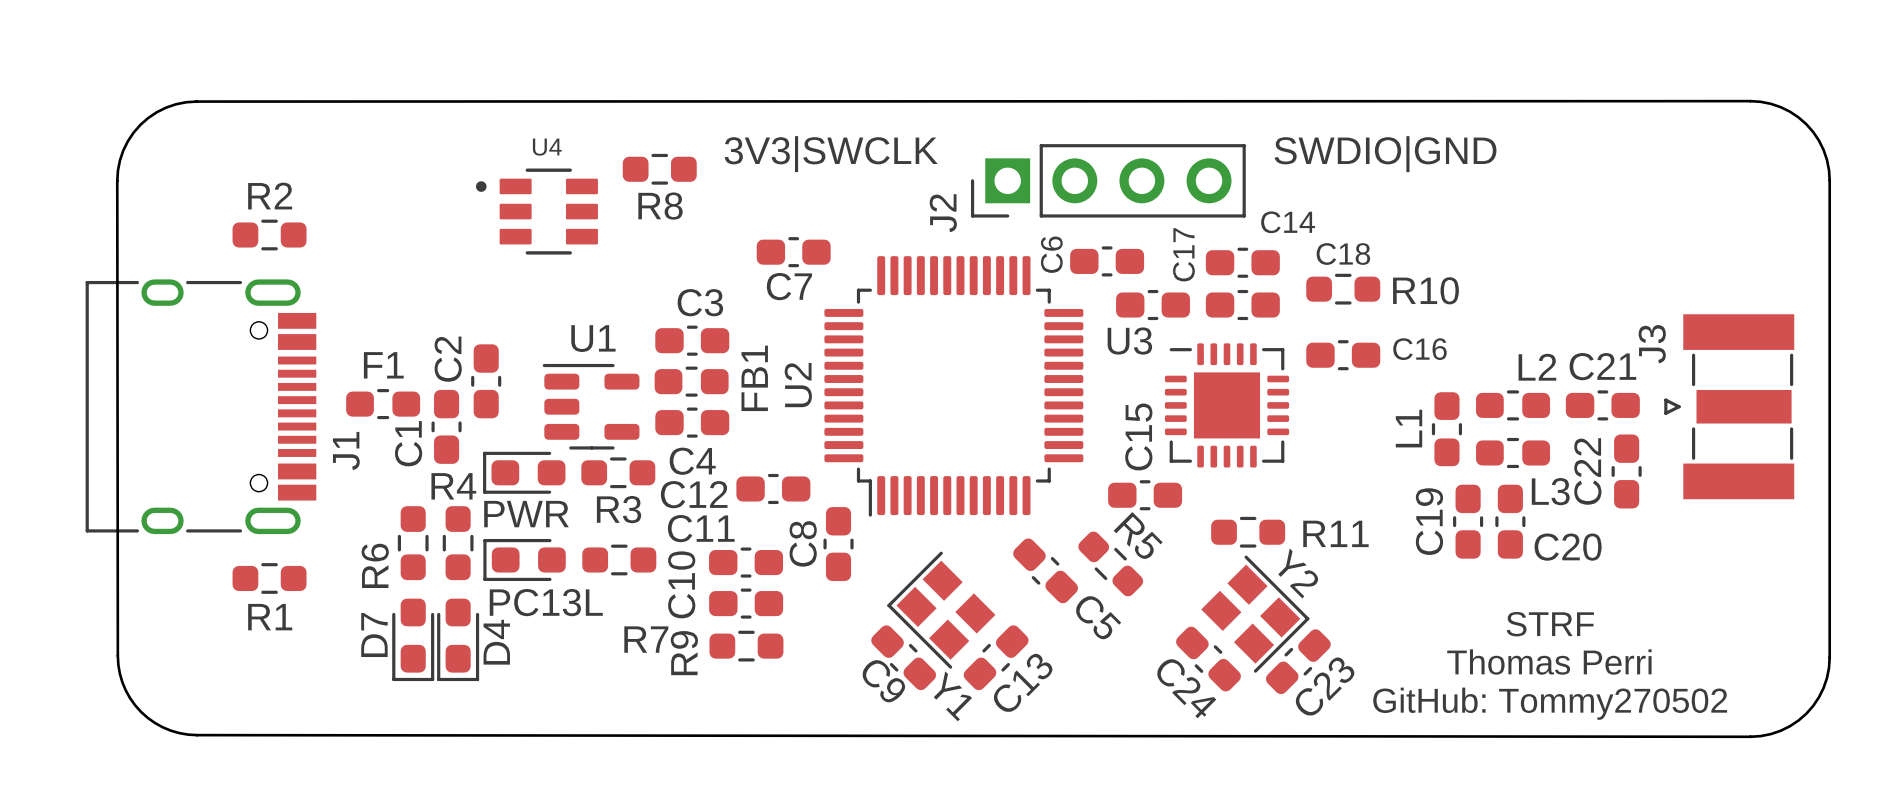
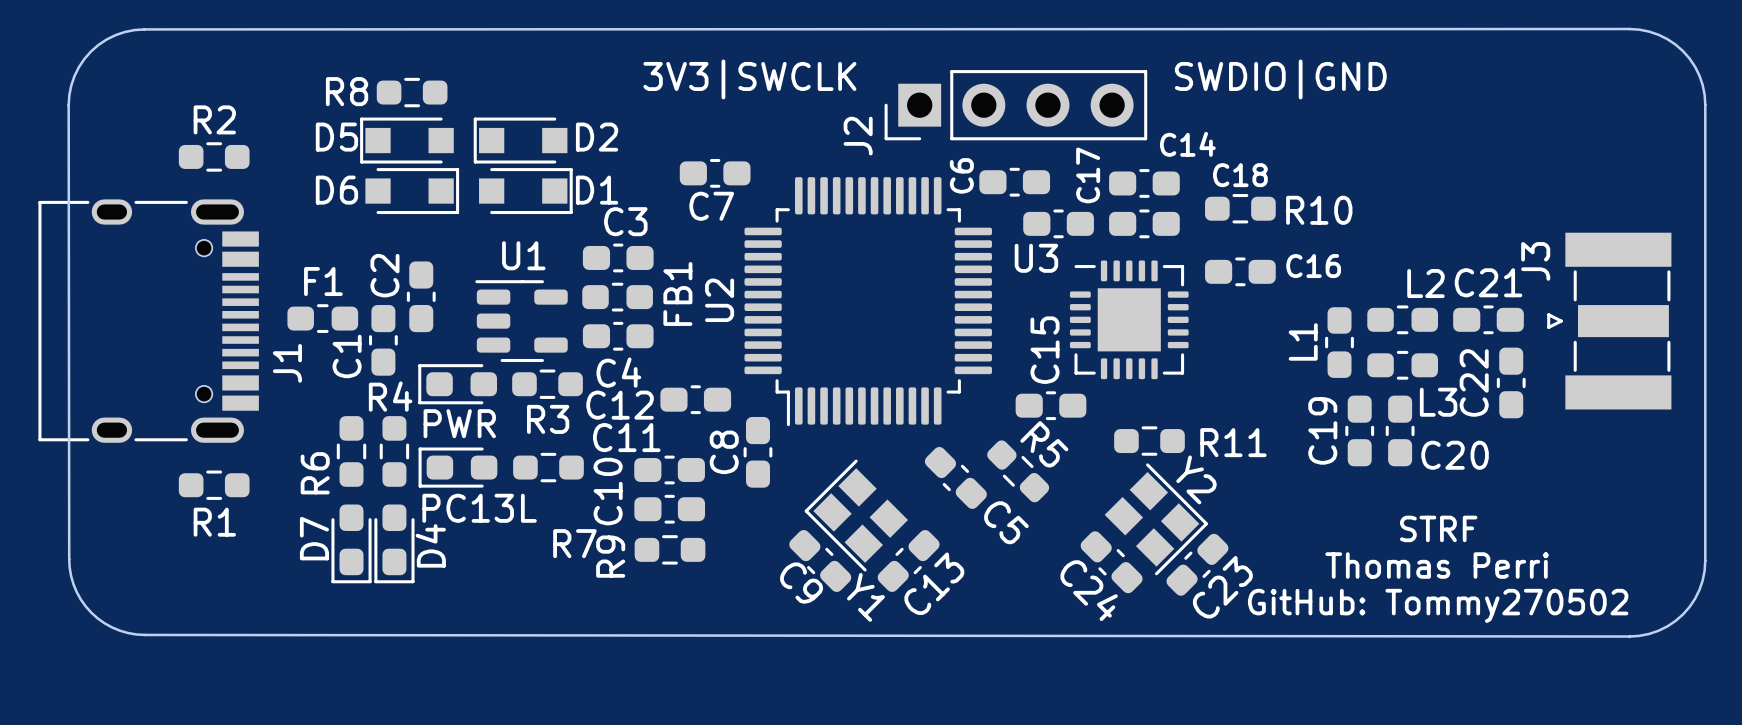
R8 position: (659, 169) -> (412, 92)
R8 name position: R8 (660, 206) -> R8 (347, 91)
U4: (536, 211) -> none
D5: none -> (406, 140)
D2: none -> (520, 140)
D6: none -> (412, 191)
D1: none -> (525, 191)

